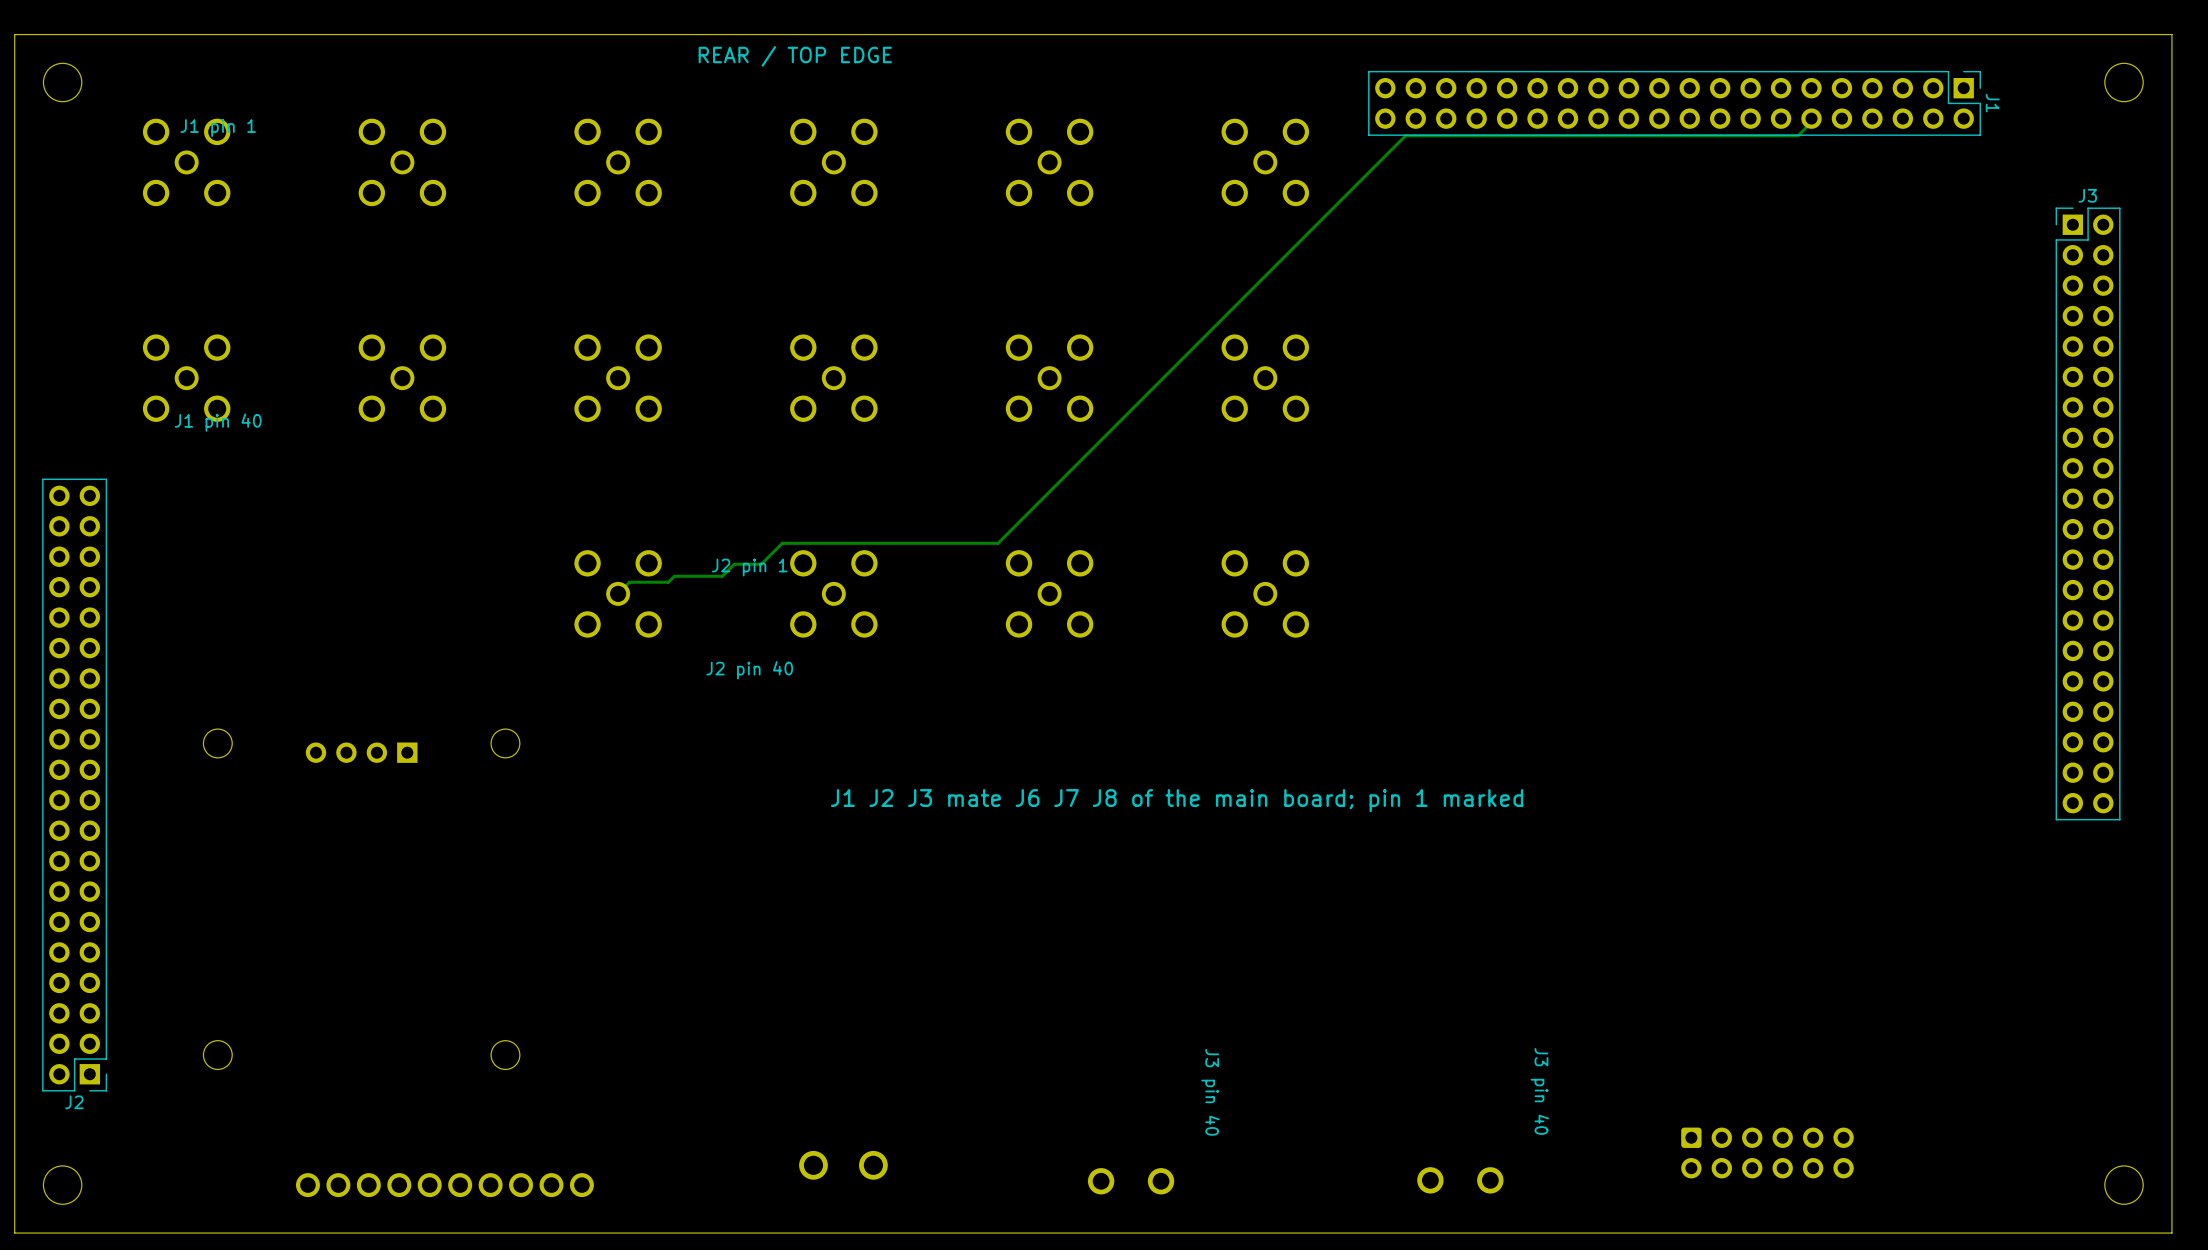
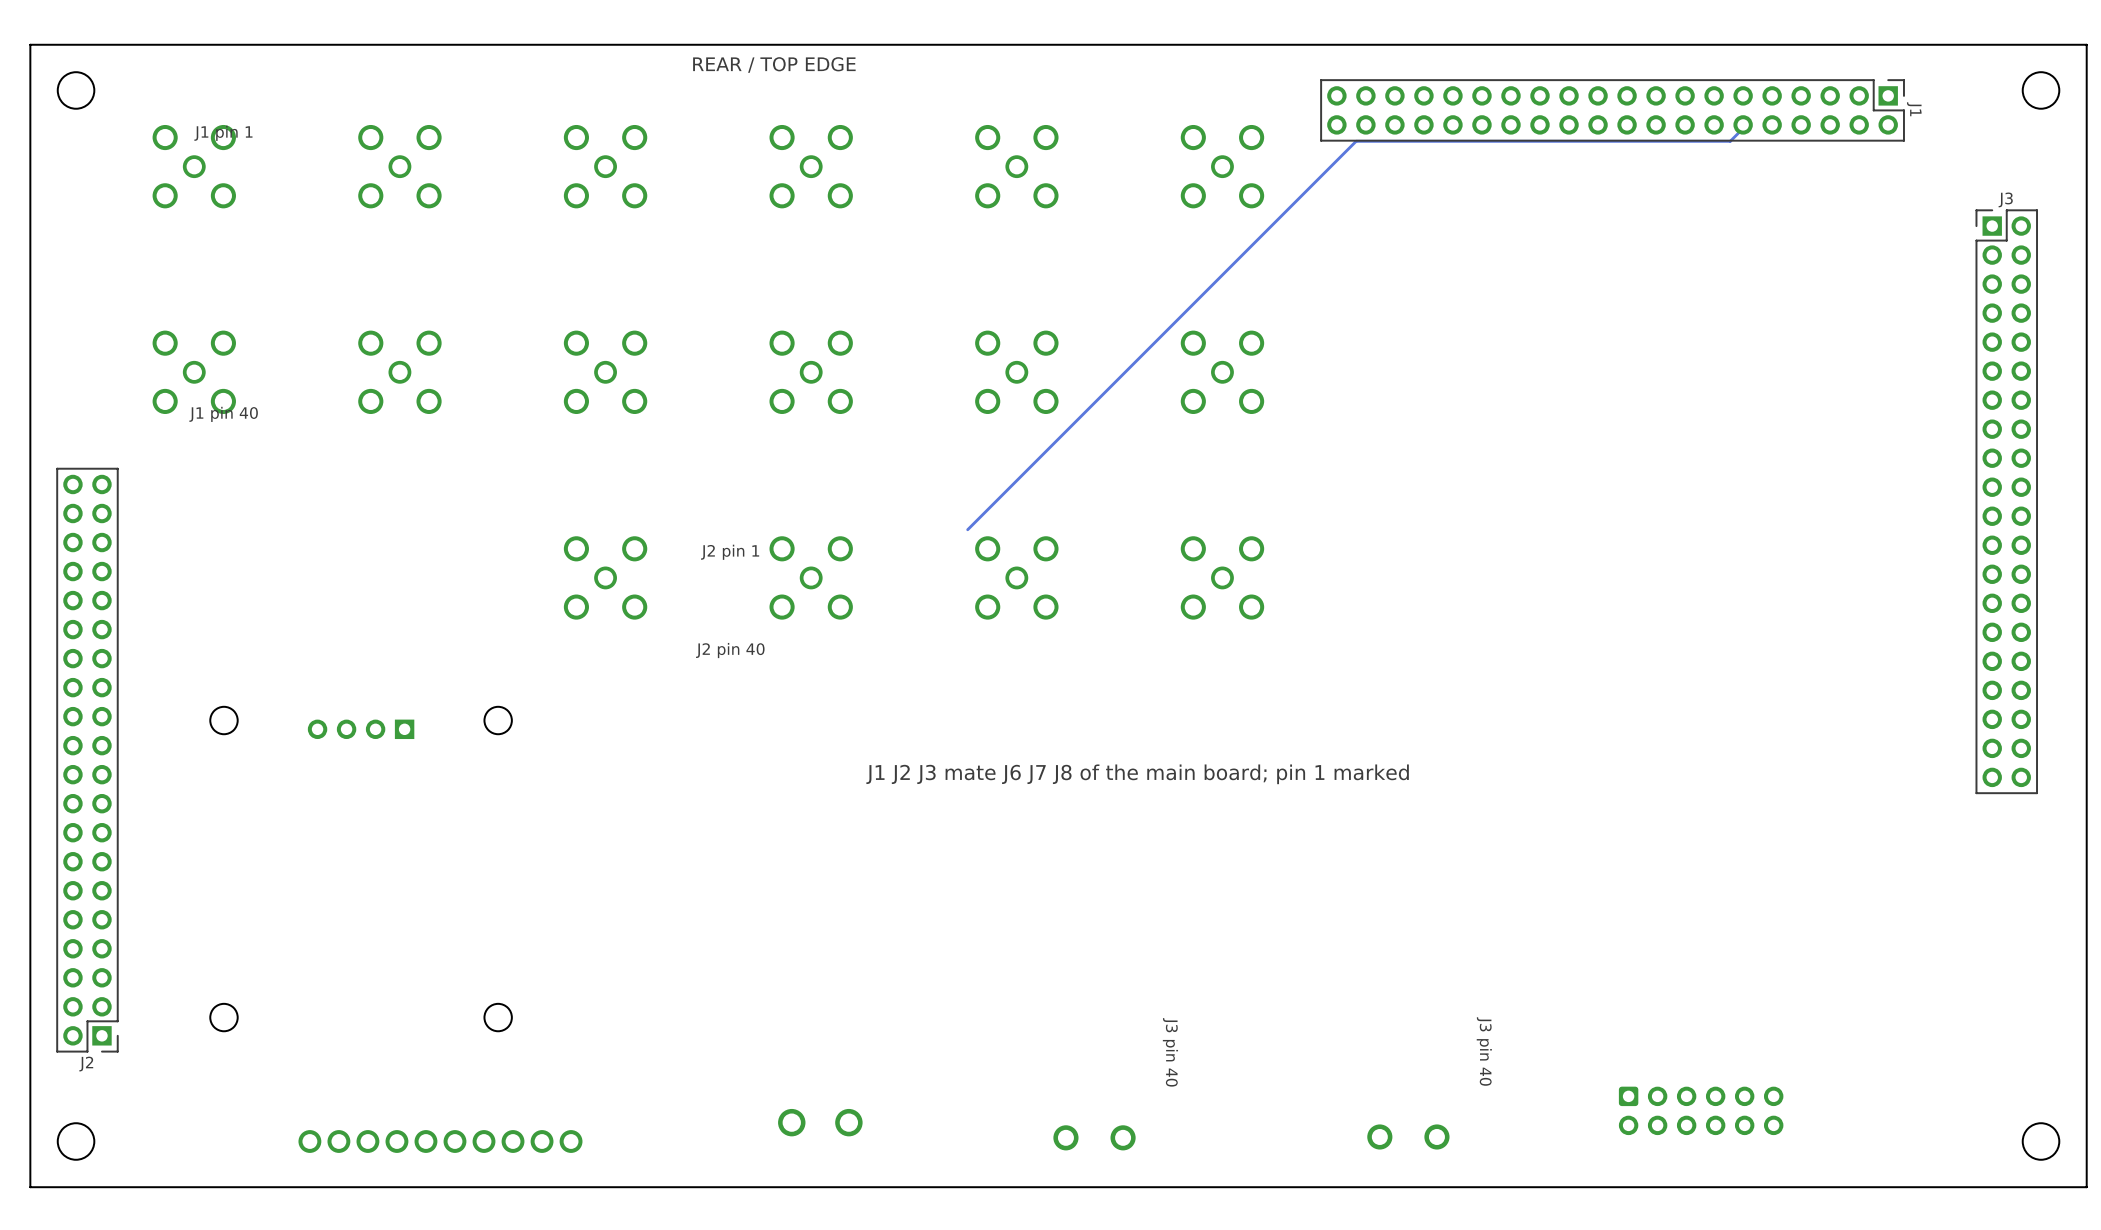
track: (998, 543) (782, 543) (761, 564) (734, 564) (722, 576) (674, 576) (668, 582) (629, 582) (618, 593) -> none

